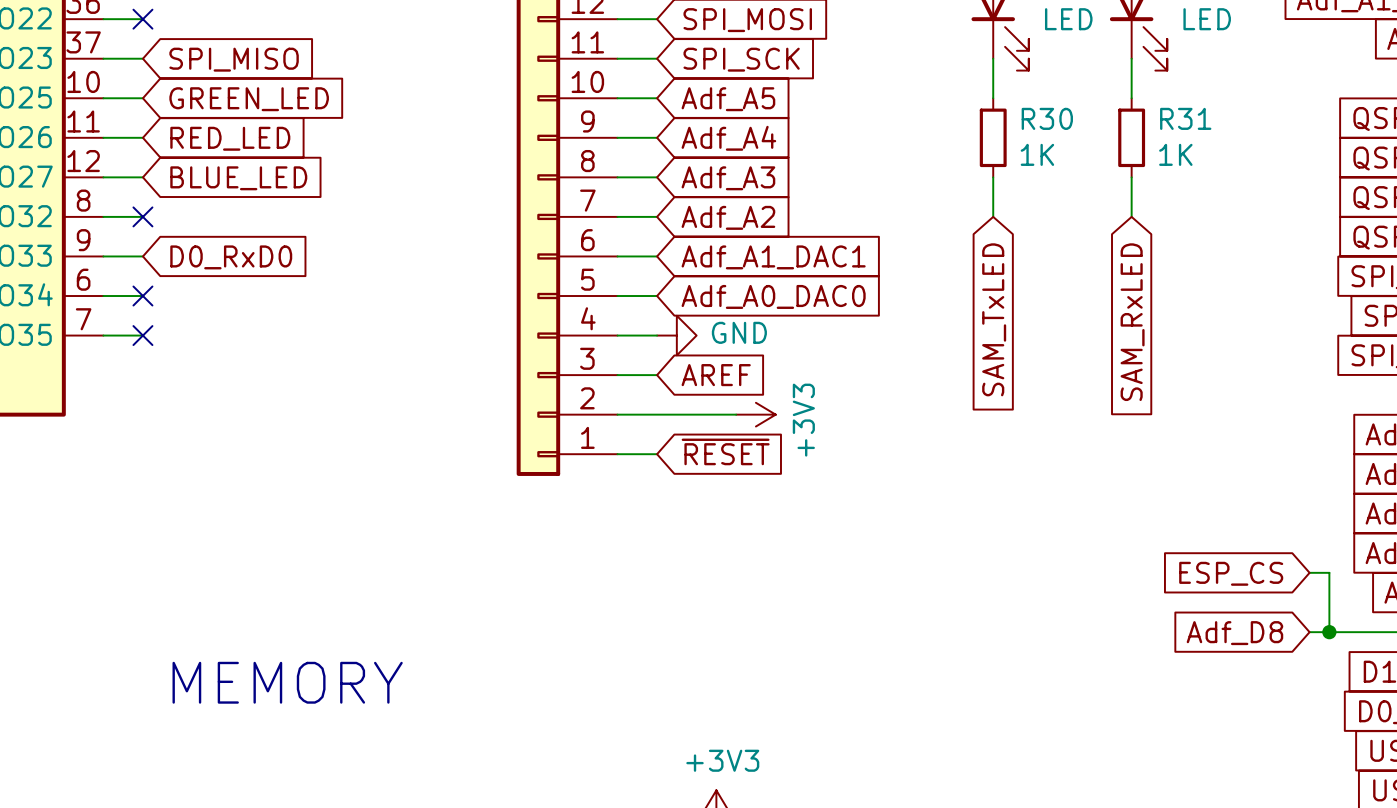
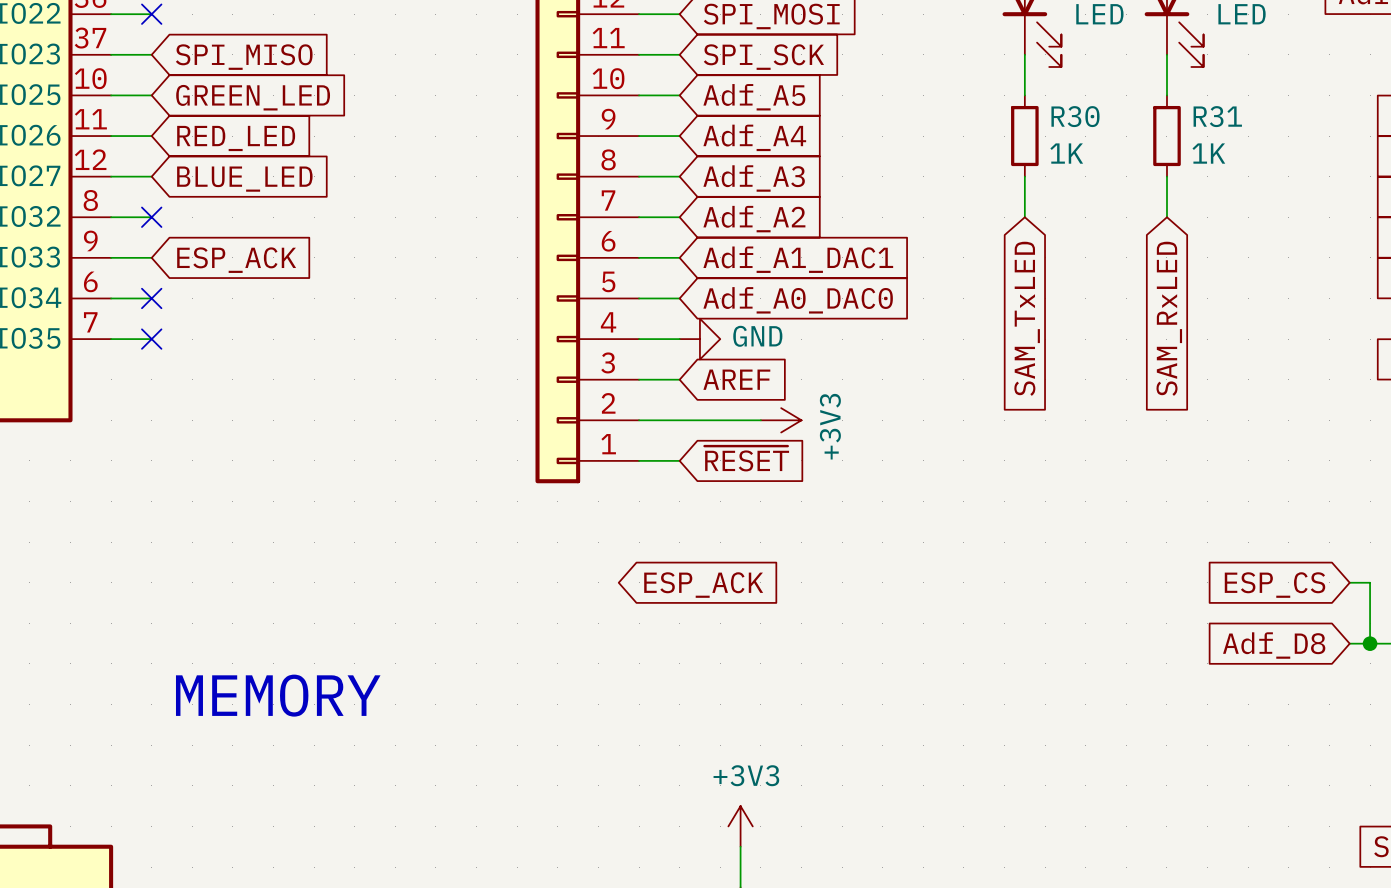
global label: D0_RxD0 (231, 257) -> ESP_ACK (236, 260)
global label: none -> ESP_ACK (703, 585)

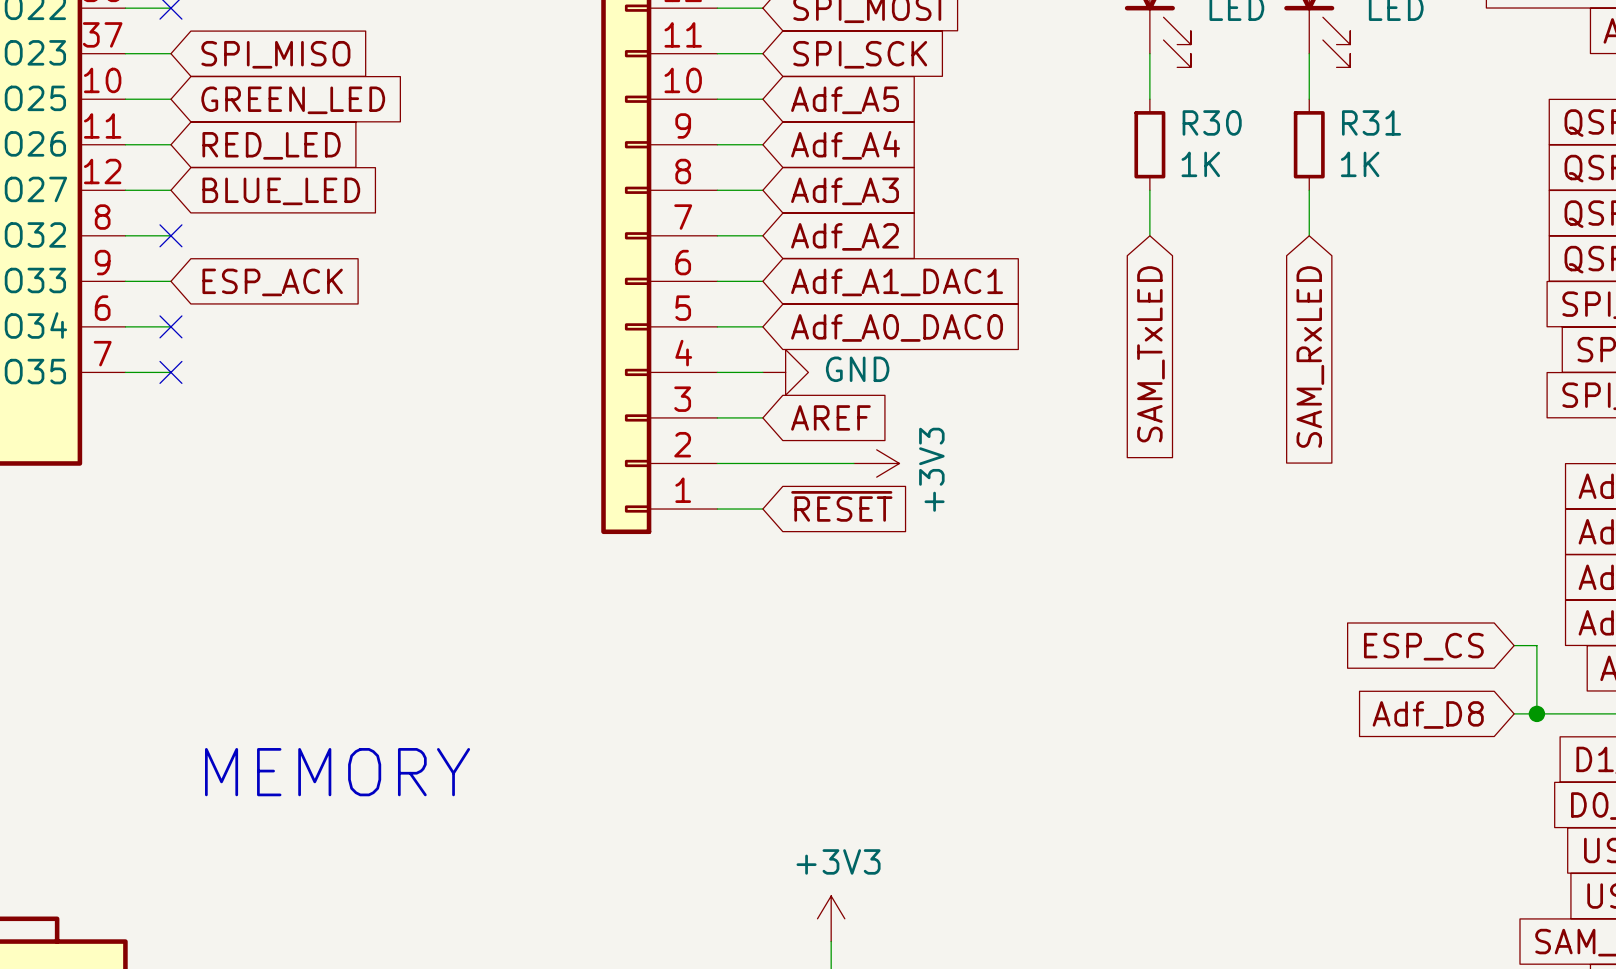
global label: ESP_ACK (703, 585) -> none

